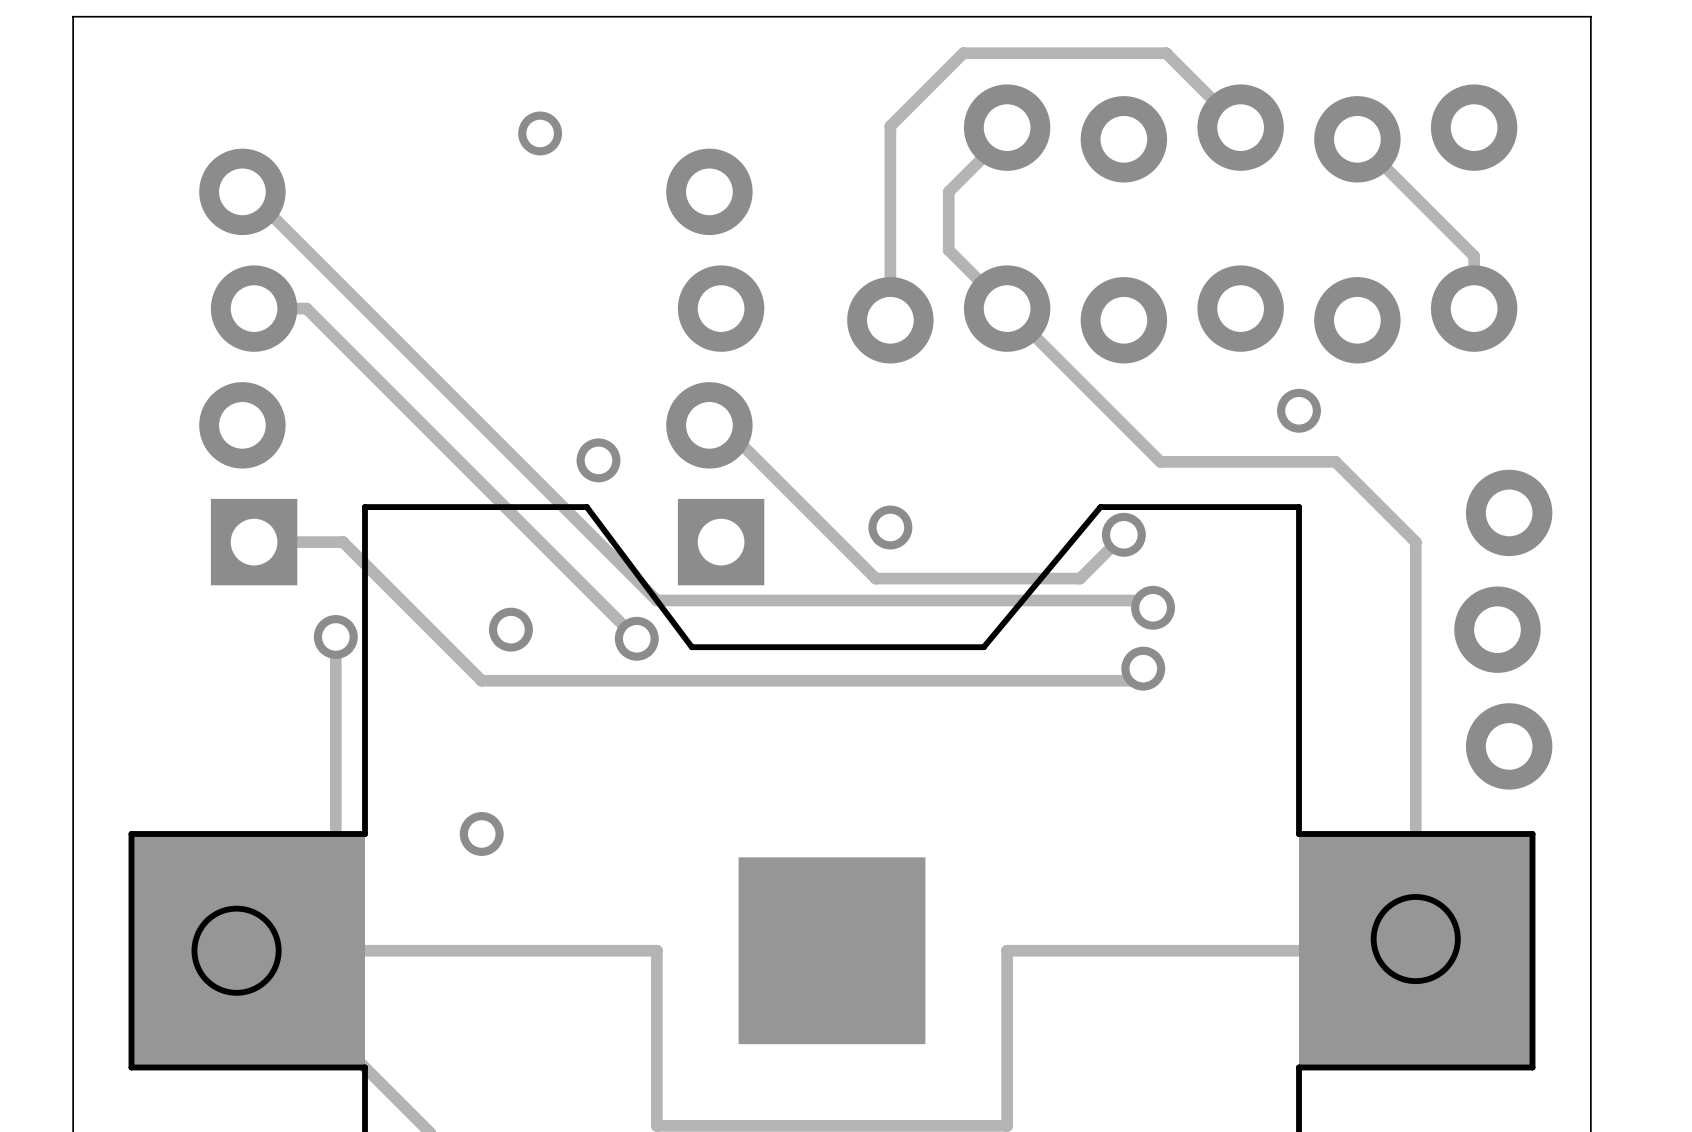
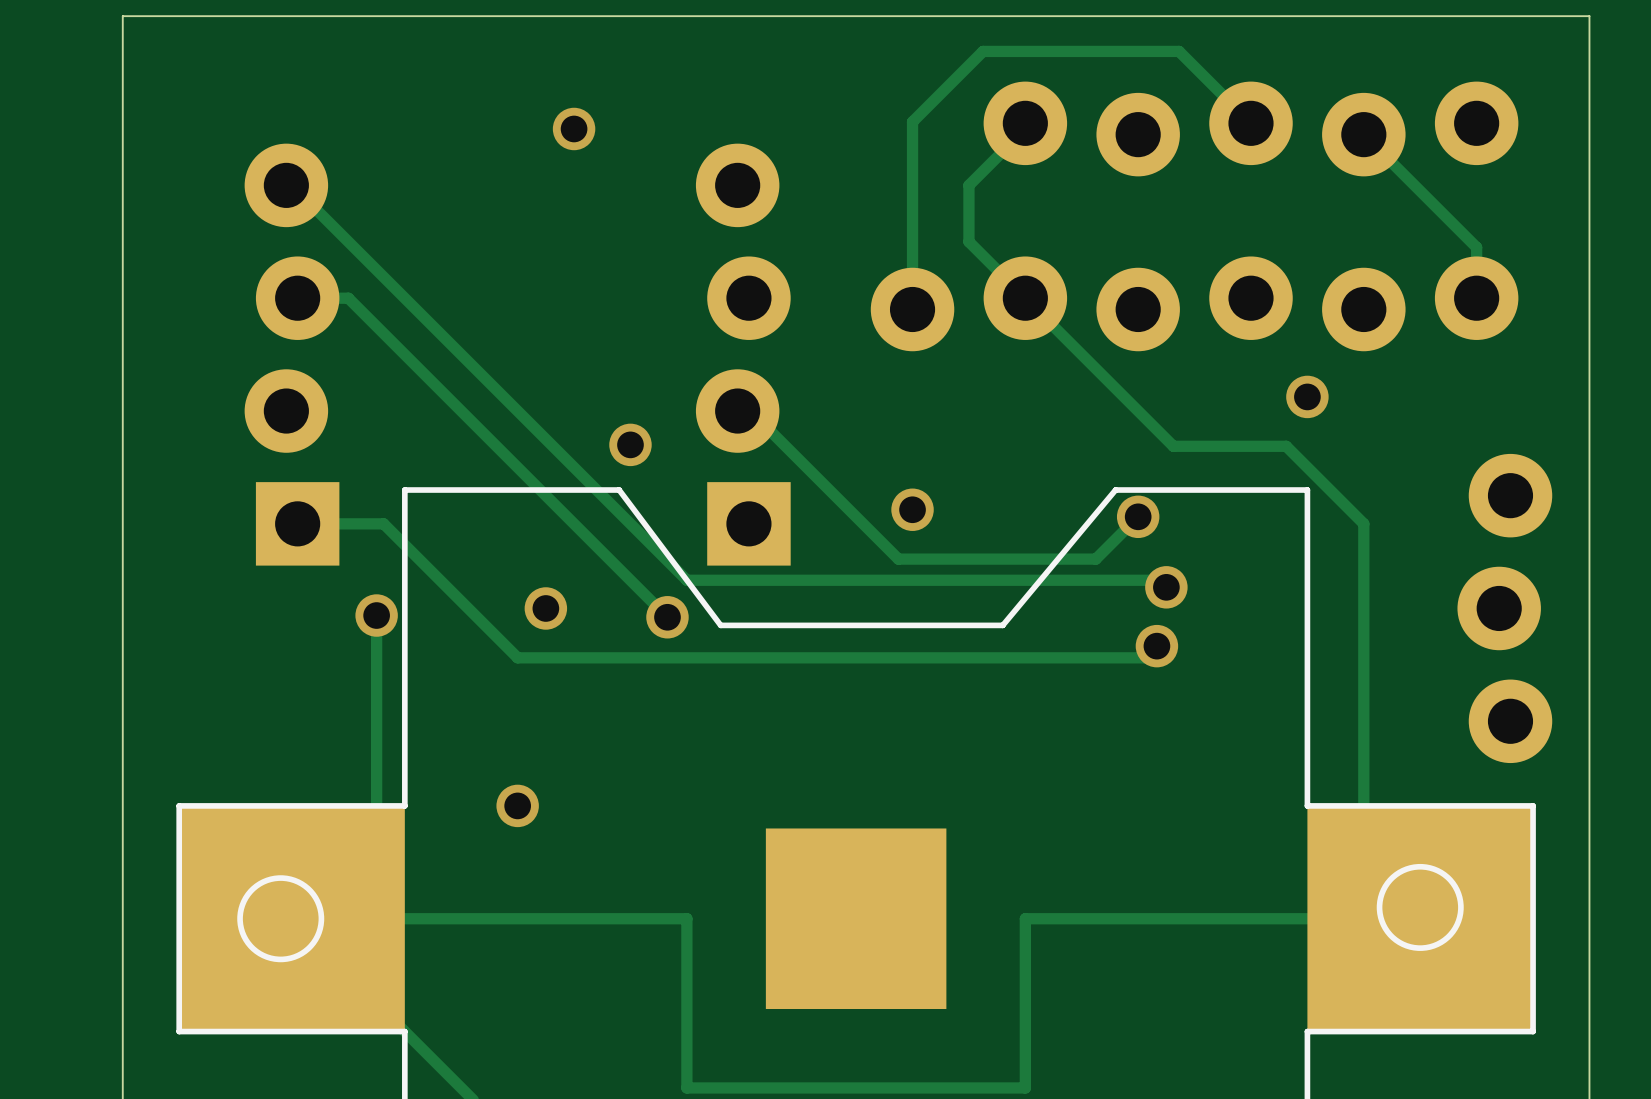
track: (1277, 461) (1335, 461) (1415, 542) (1415, 950) -> (1286, 446) (1363, 523) (1363, 862) (1420, 918)

